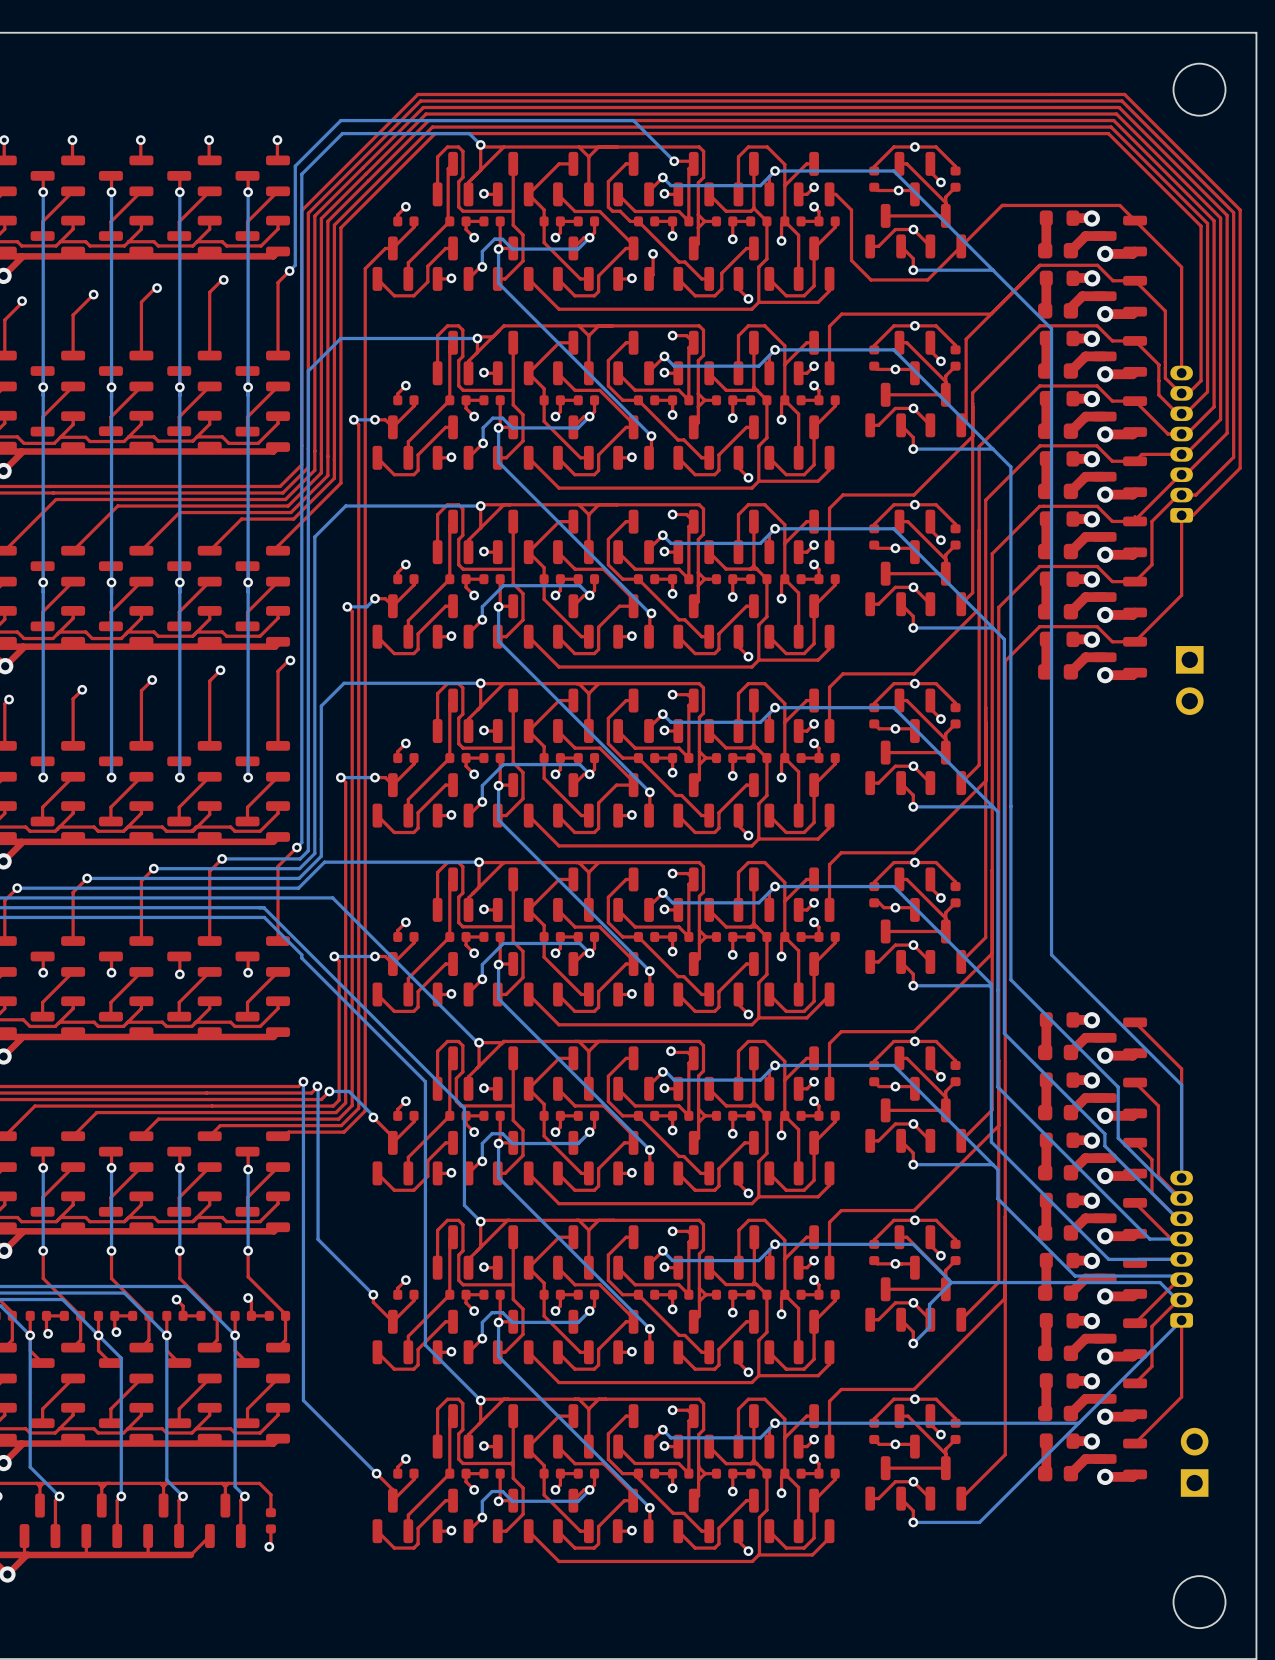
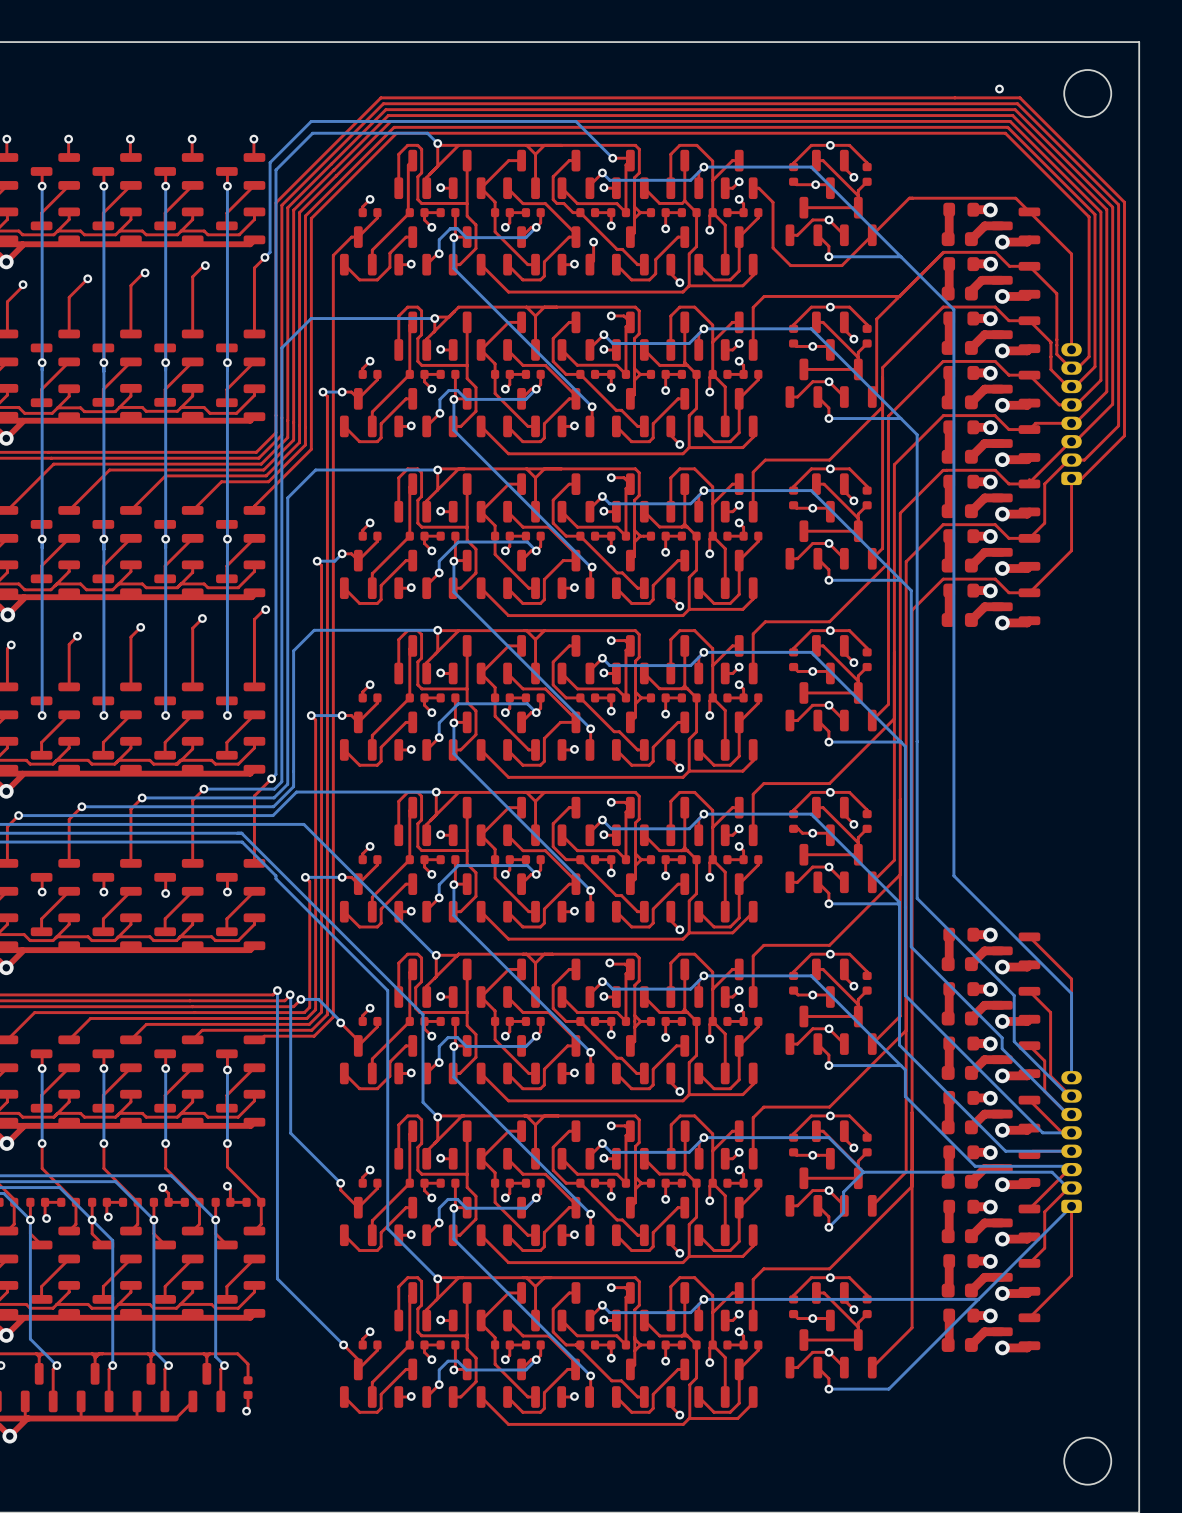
via: none -> (999, 89)
part: (1189, 680) -> none
part: (1194, 1462) -> none

